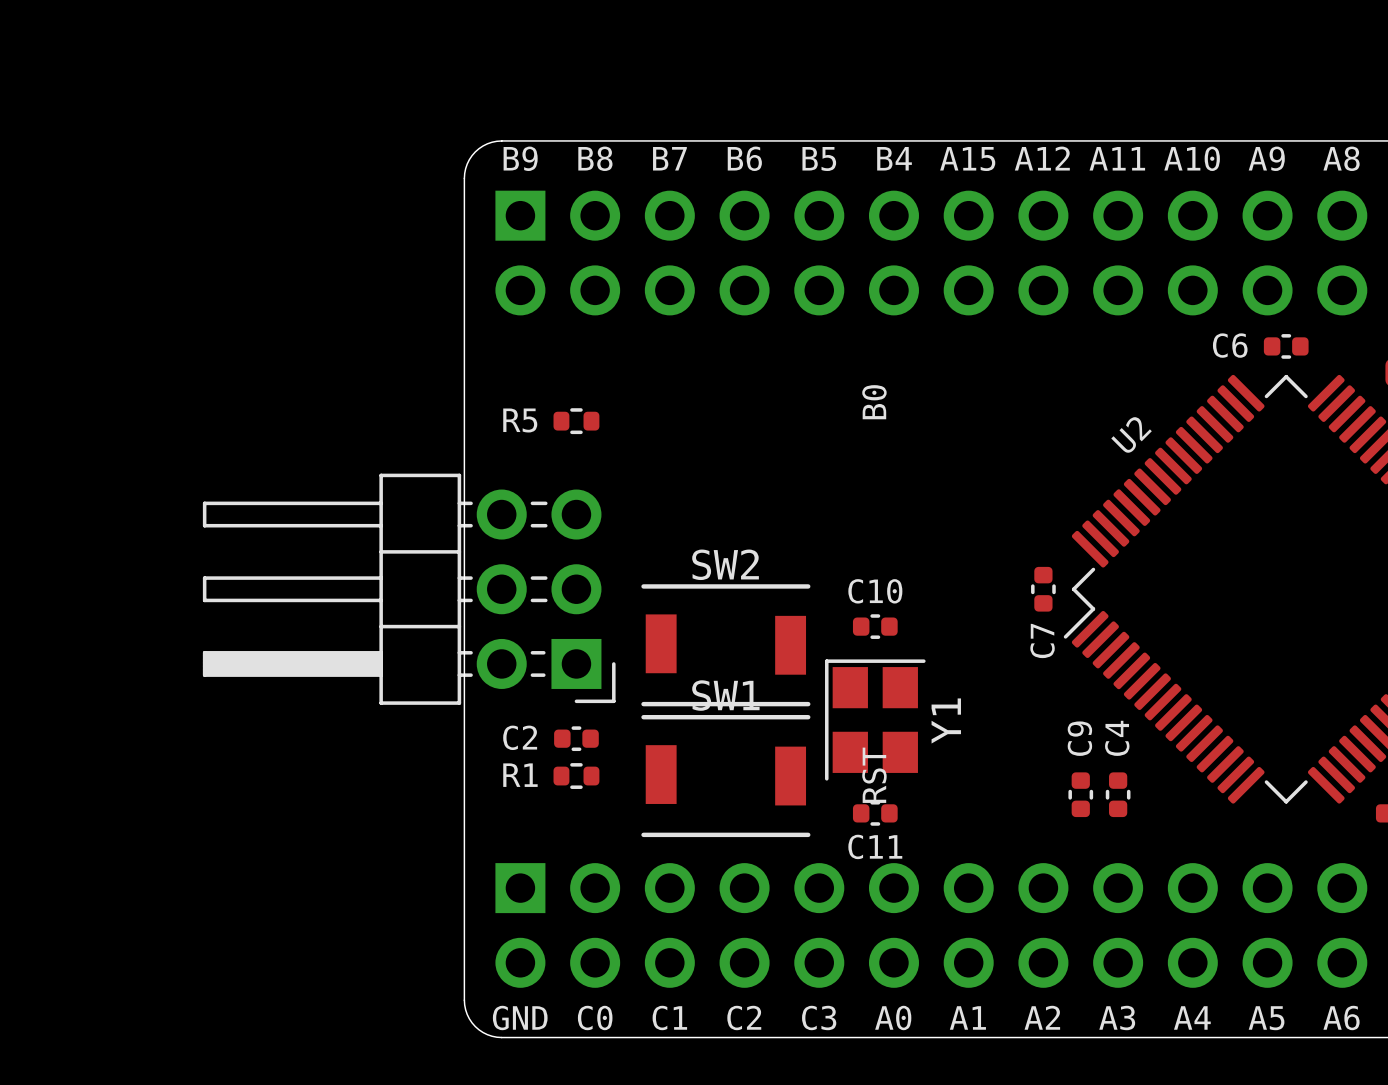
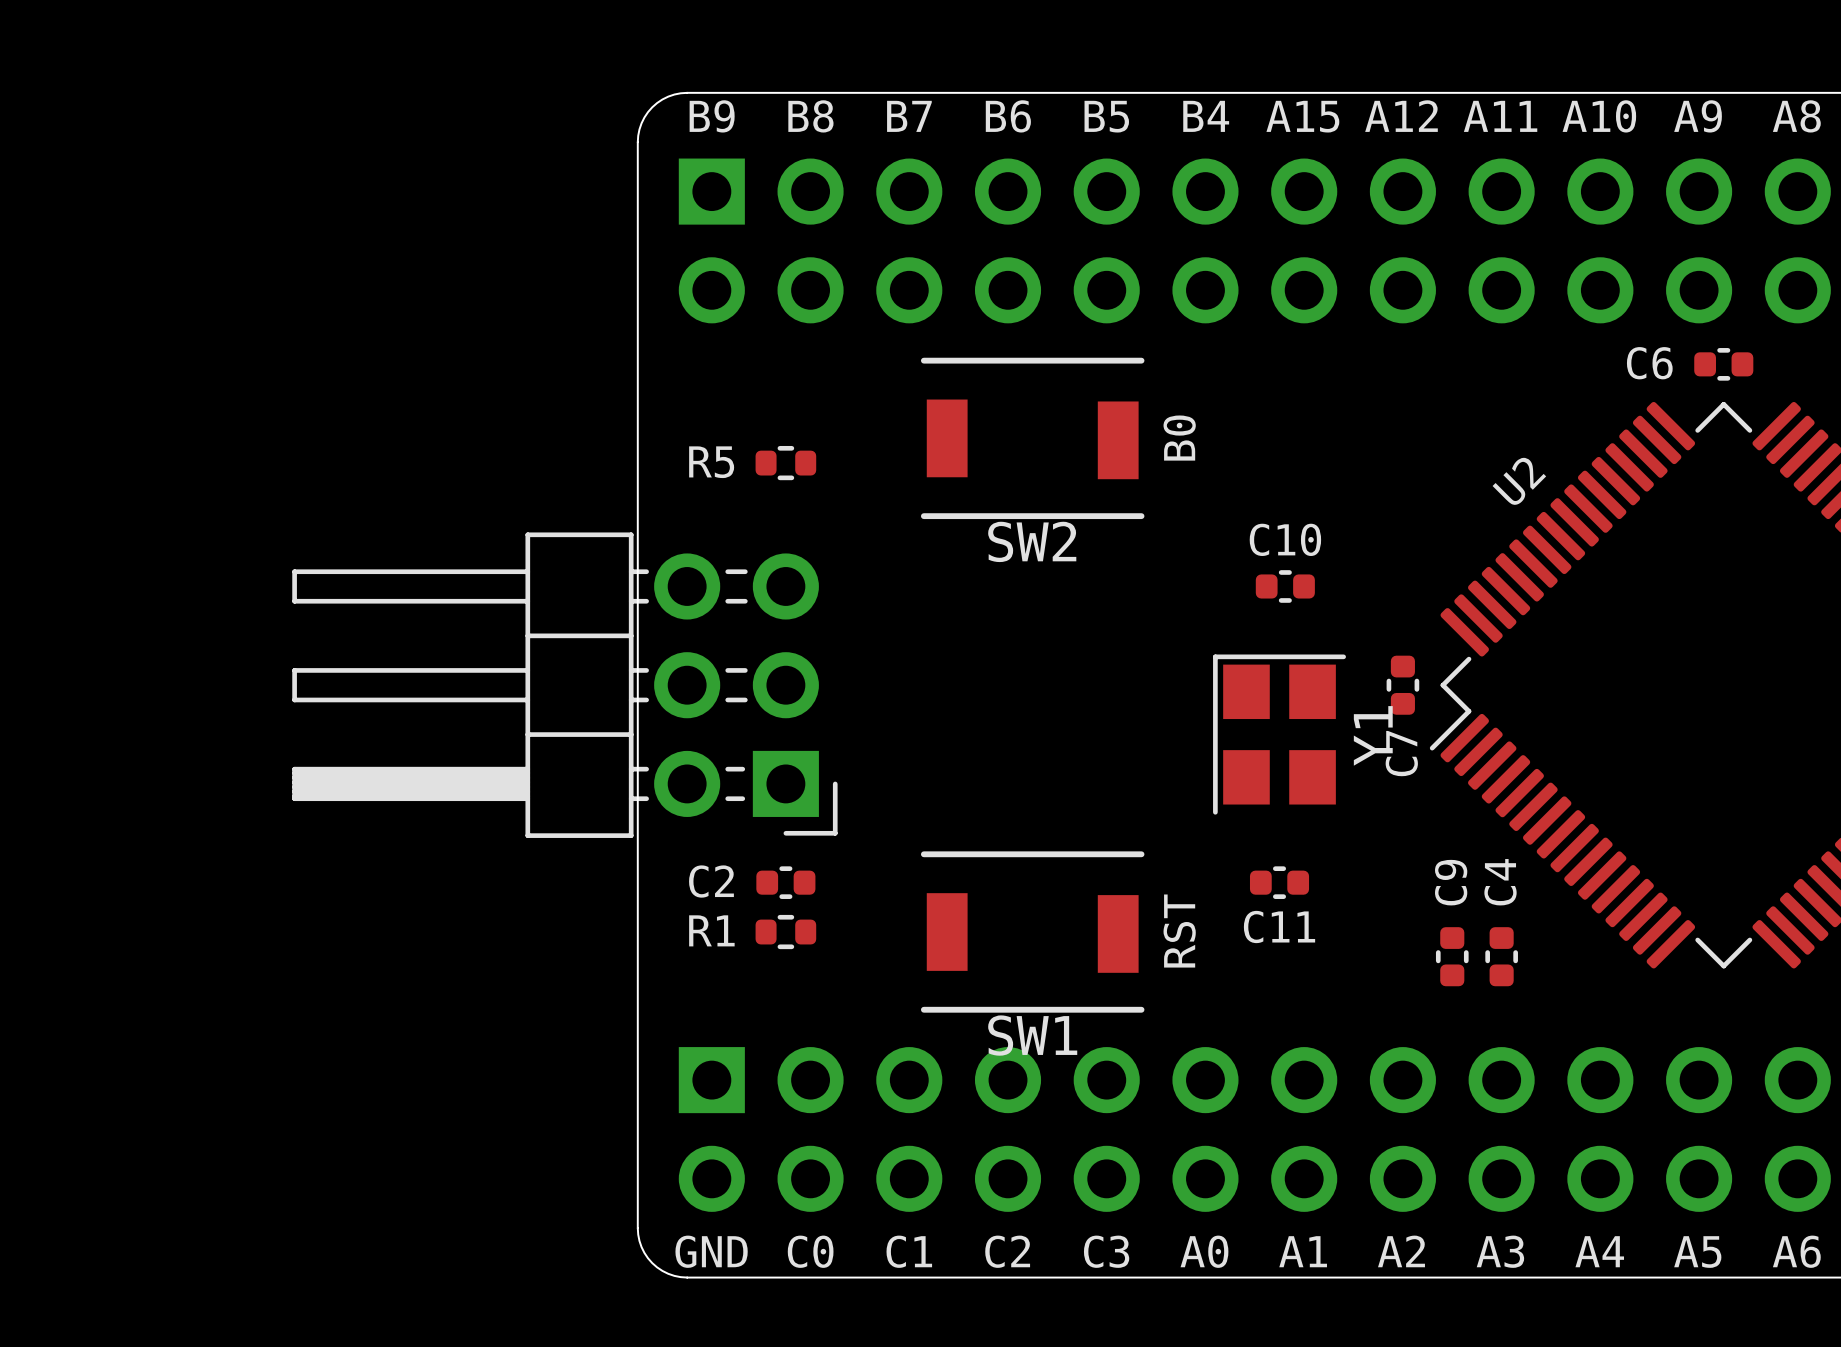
C10 position: (875, 626) -> (1285, 586)
SW2 rotation: 0° (725, 645) -> 180° (1032, 438)
SW2 position: (725, 645) -> (1032, 438)
Y1 position: (875, 719) -> (1279, 734)
SW1 rotation: 0° (725, 776) -> 180° (1032, 932)
C11 position: (875, 813) -> (1279, 882)

